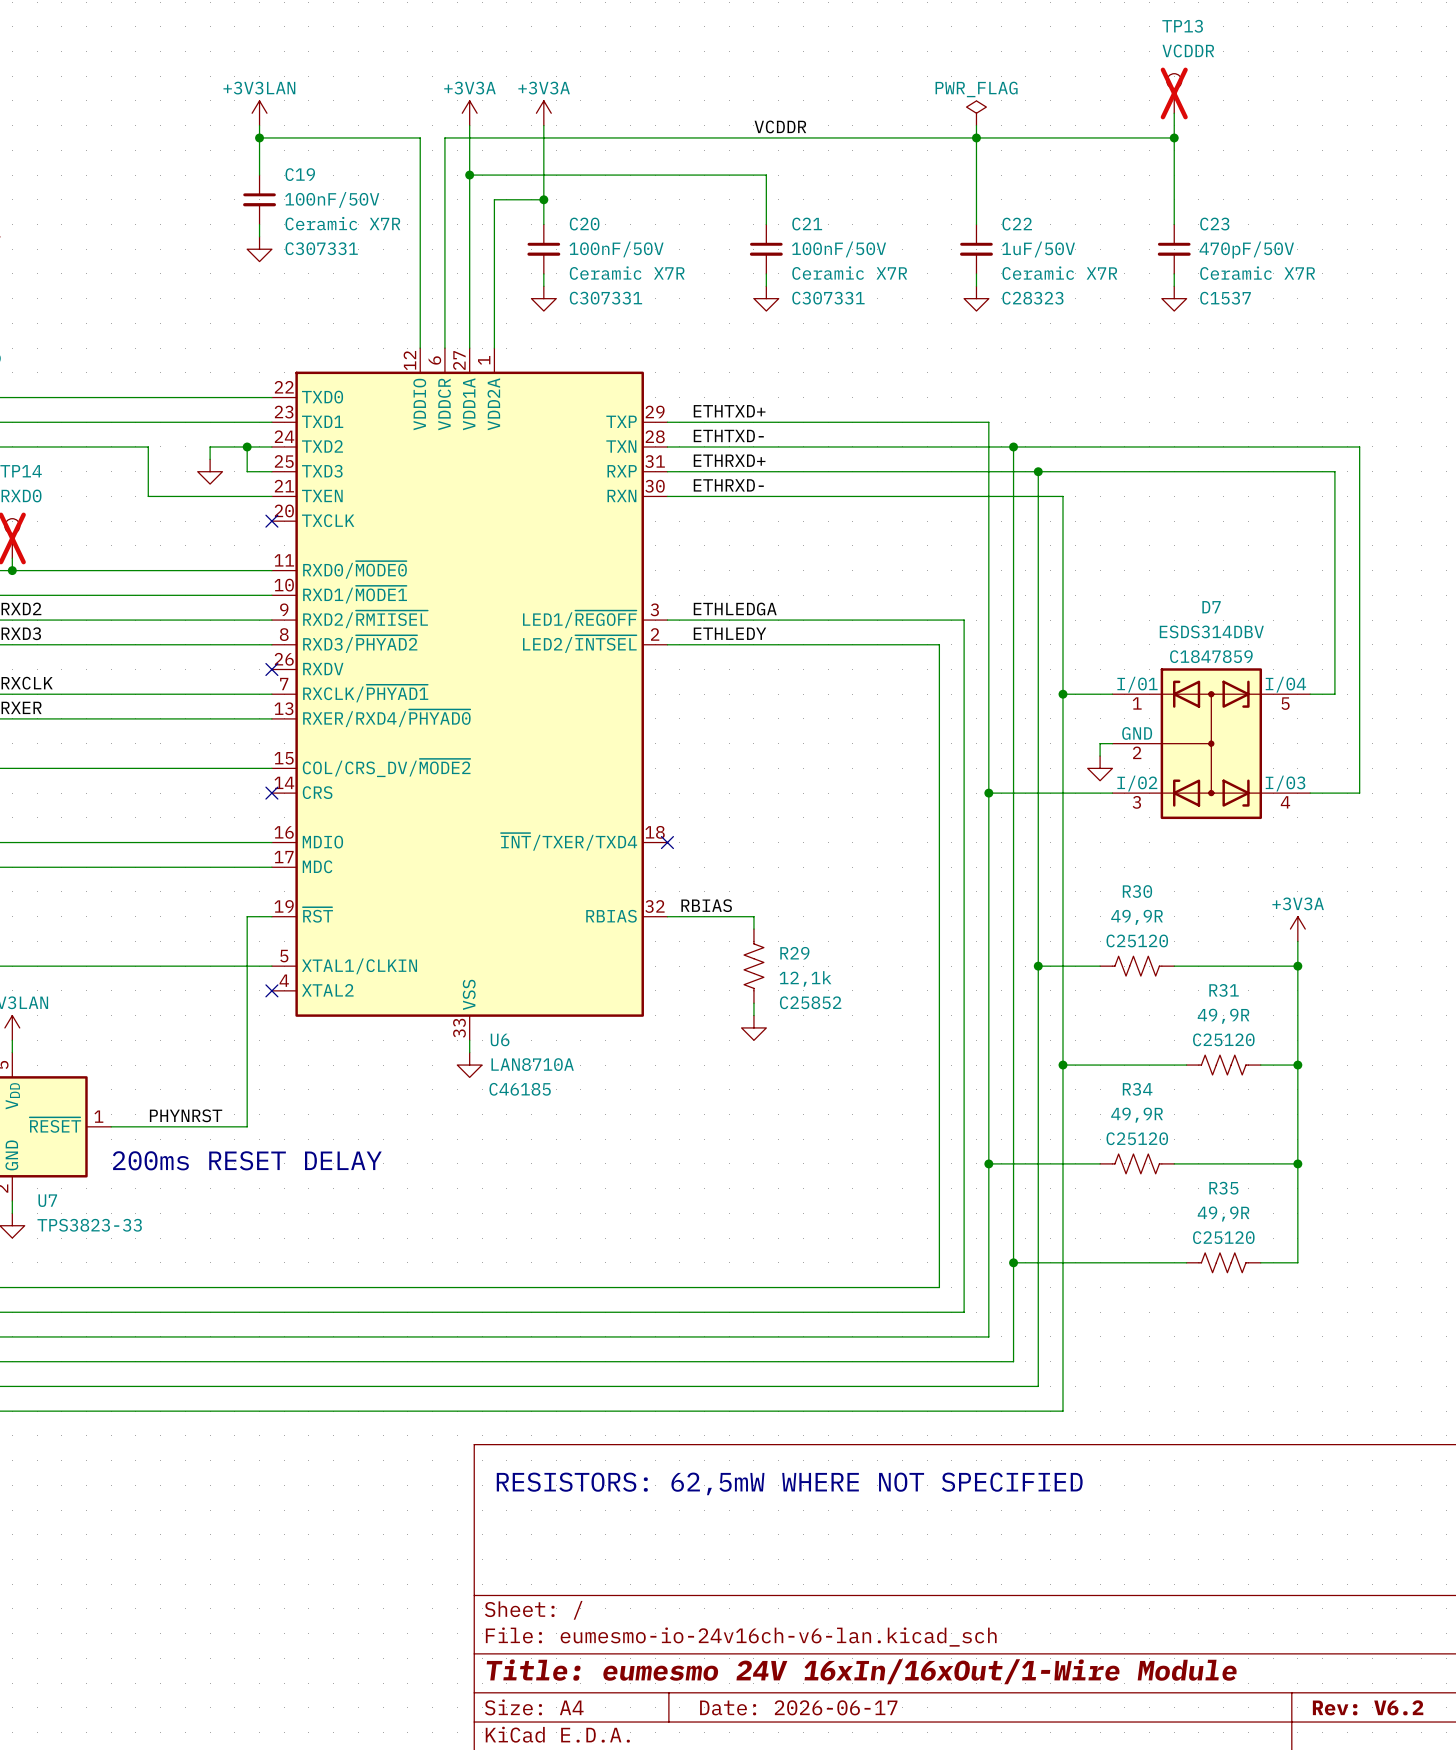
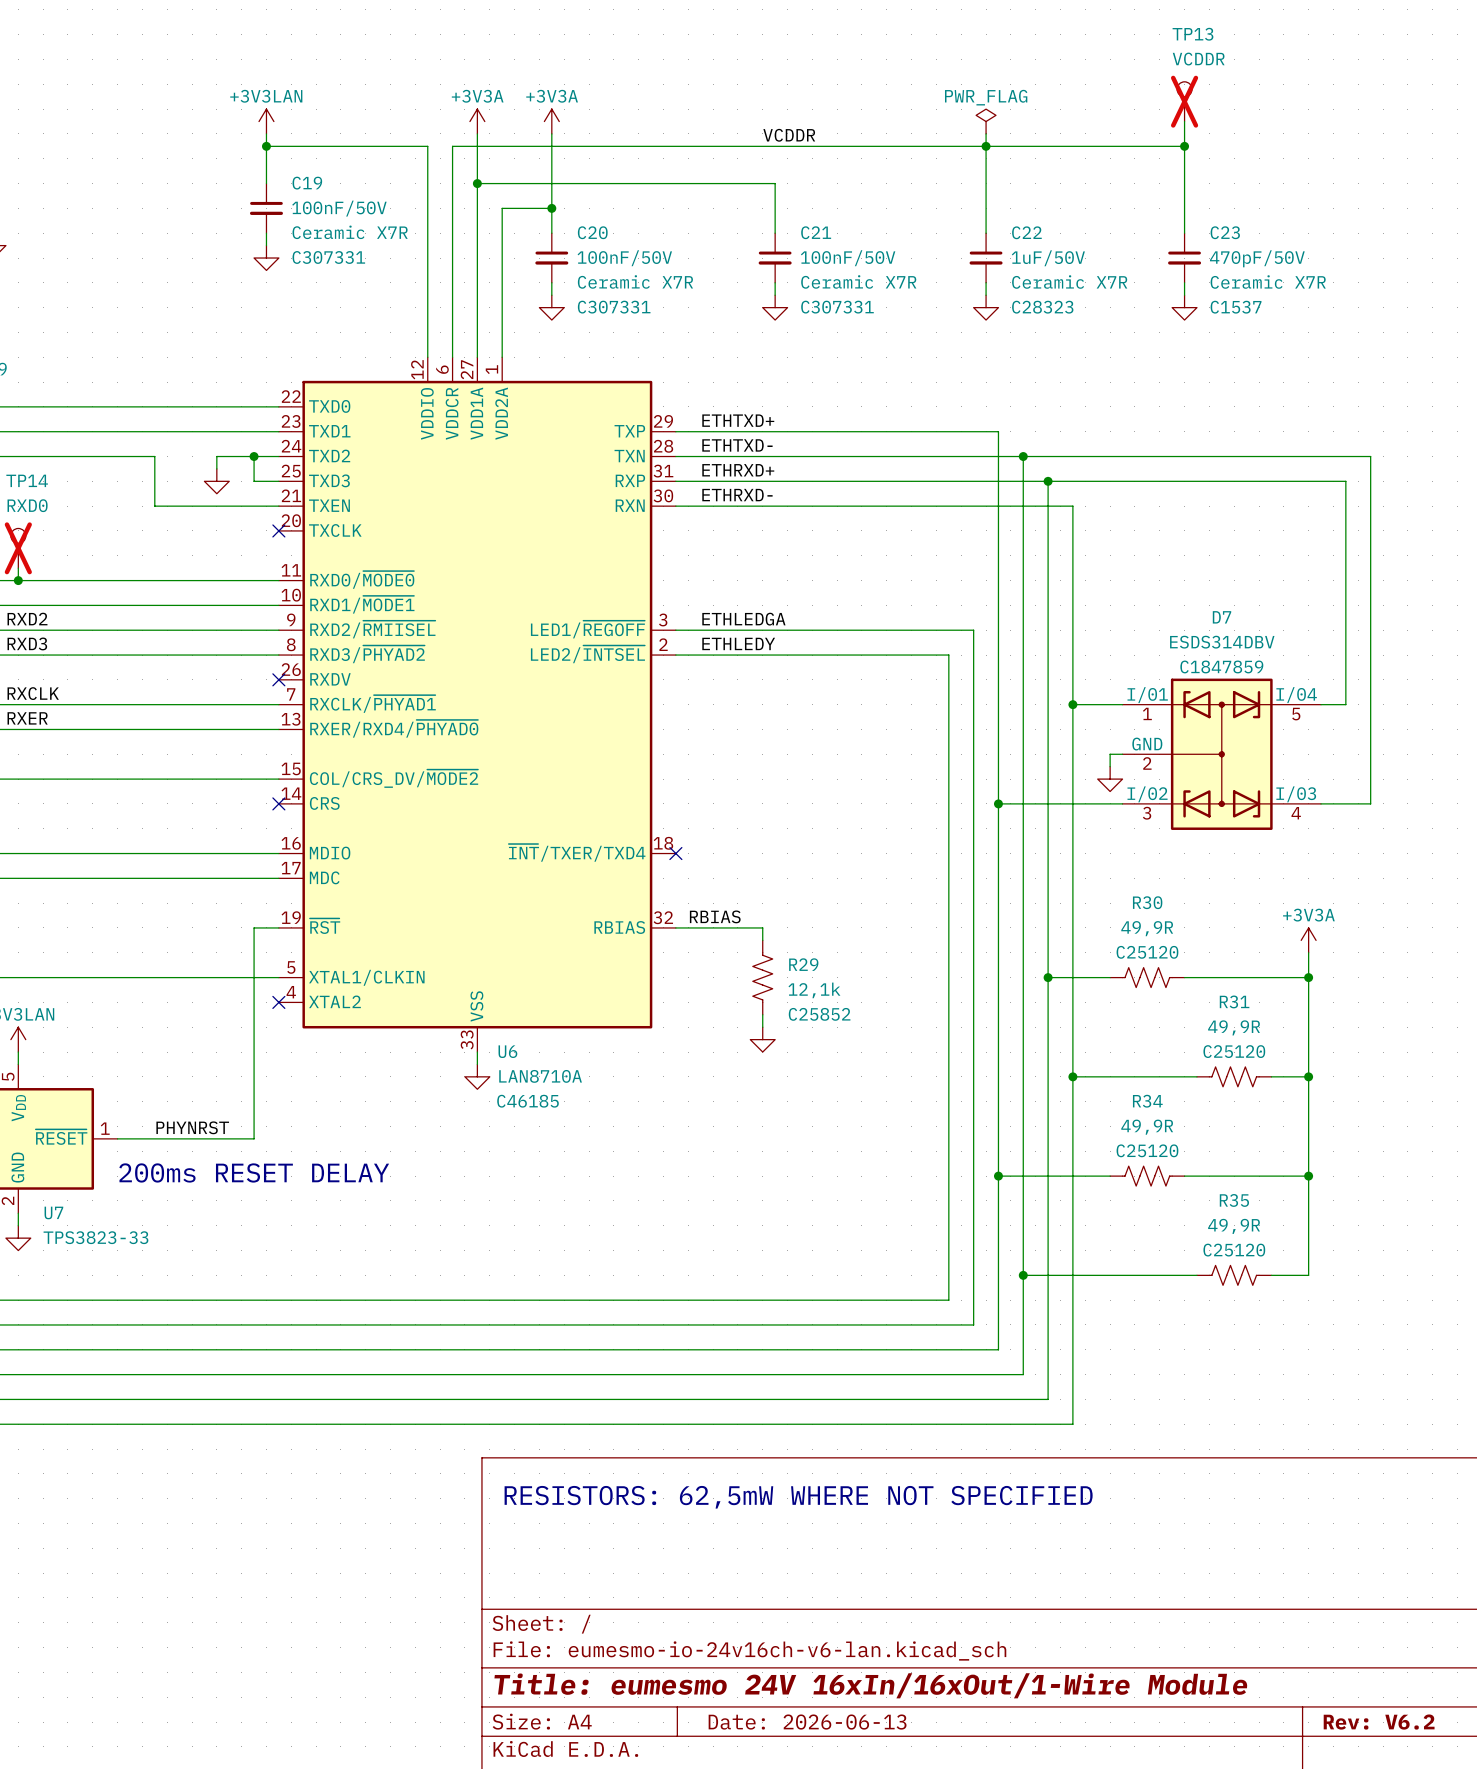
title block: Date: 2026-06-17 (798, 1707) -> Date: 2026-06-13 (807, 1722)

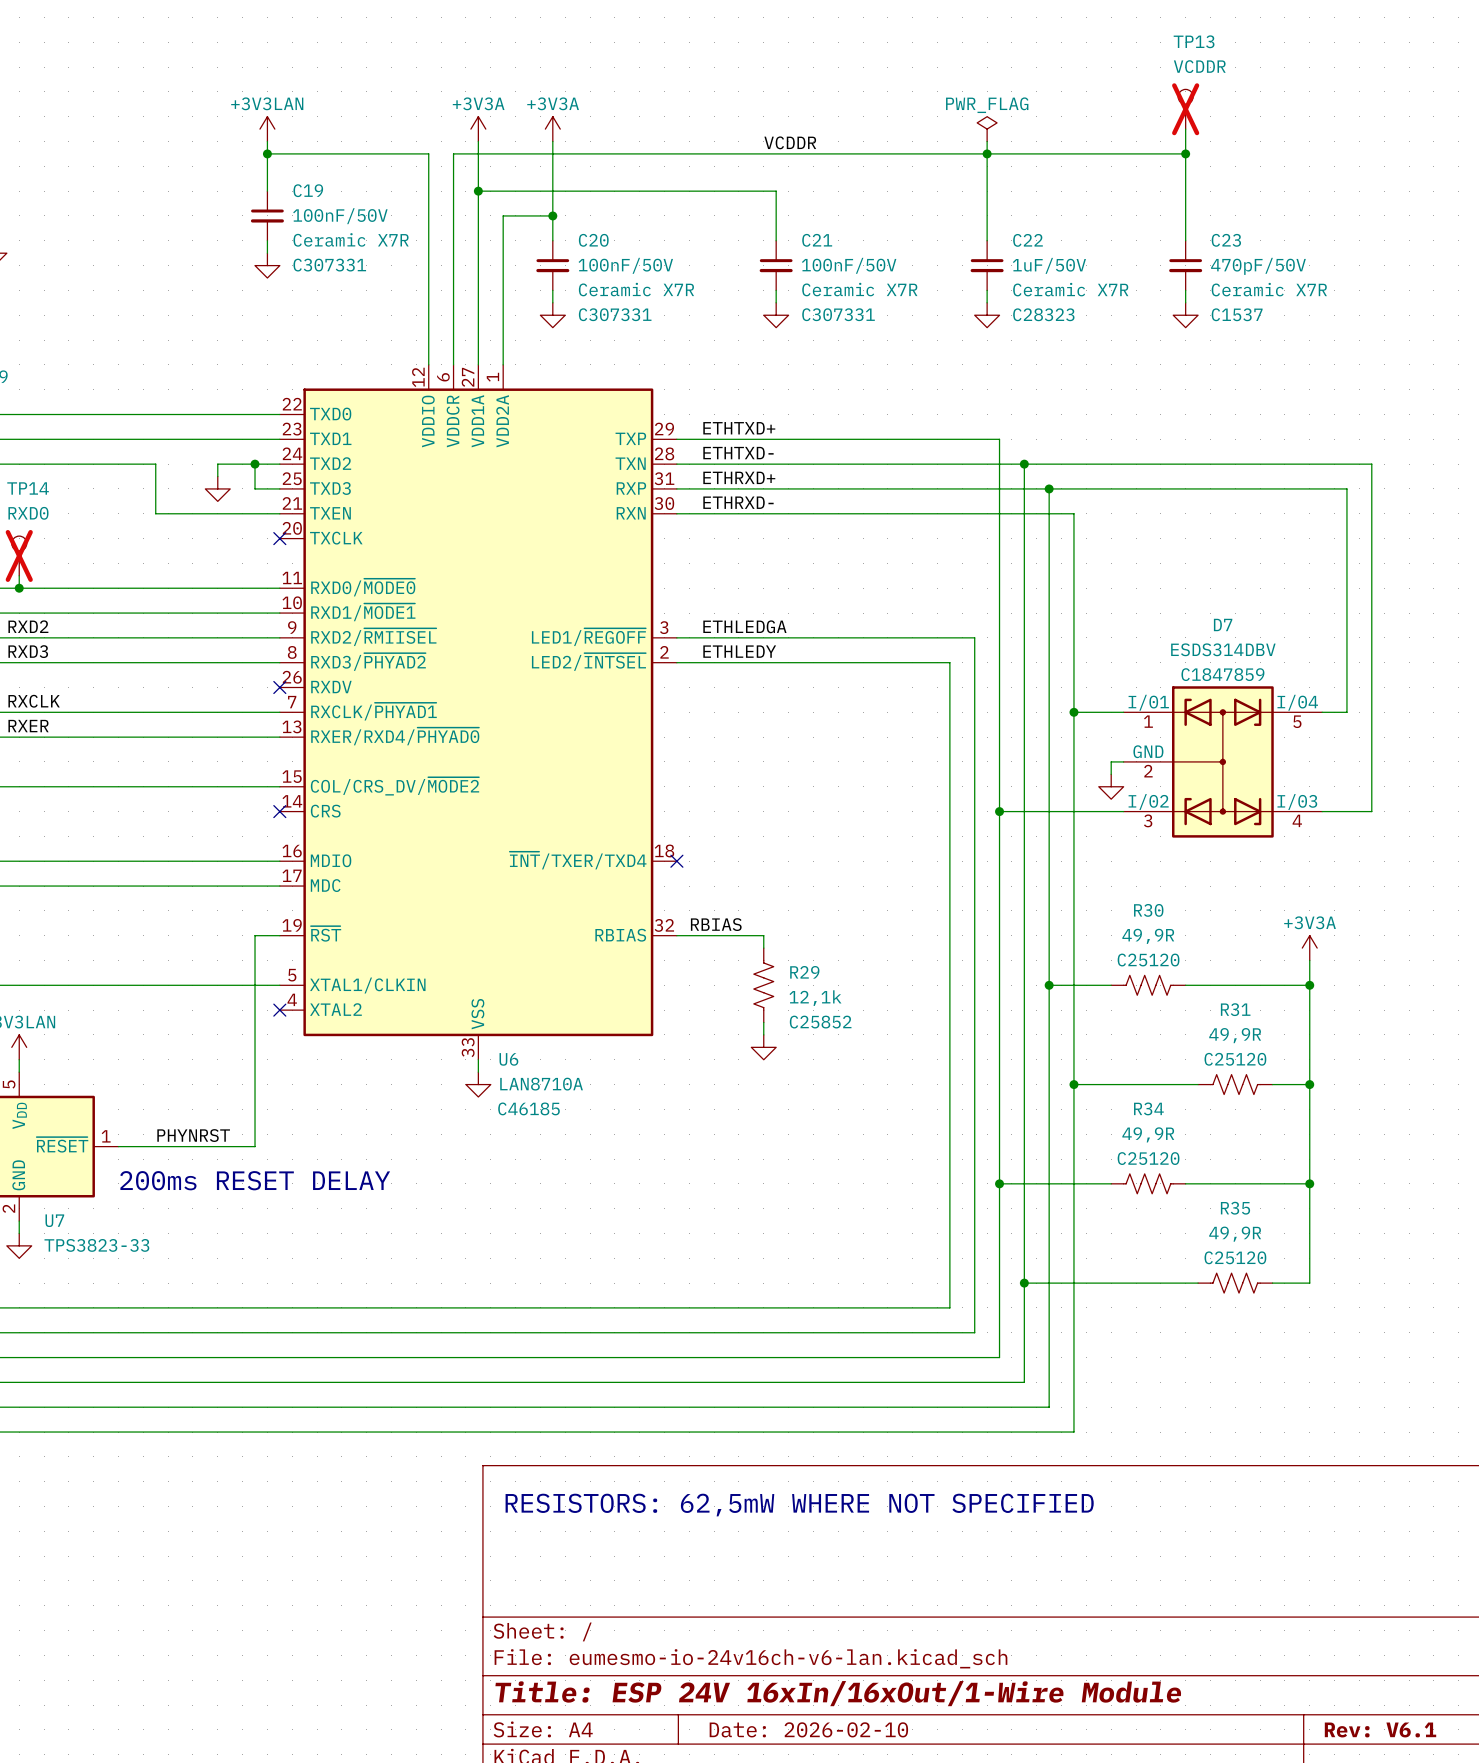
title block: Title: eumesmo 24V 16xIn/16xOut/1-Wire Module (870, 1685) -> Title: ESP 24V 16xIn/16xOut/1-Wire Module (838, 1693)
title block: Date: 2026-06-13 (807, 1722) -> Date: 2026-02-10 (808, 1729)
title block: Rev: V6.2 (1379, 1722) -> Rev: V6.1 (1380, 1729)

